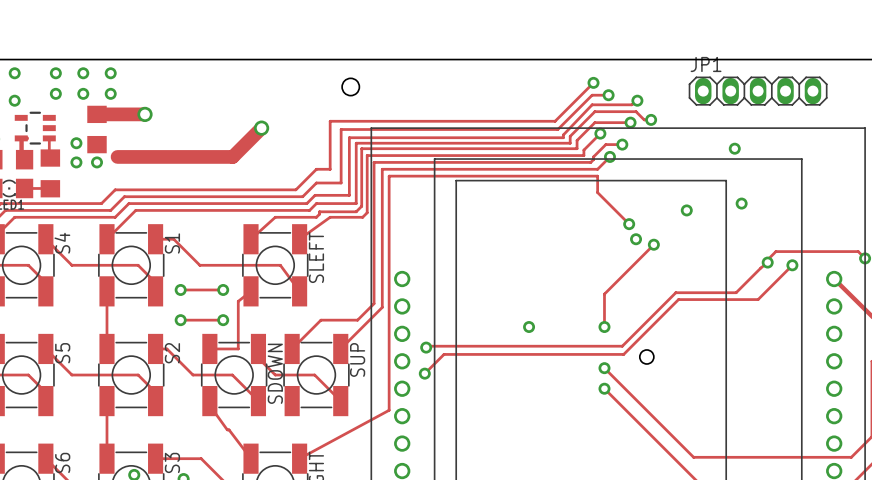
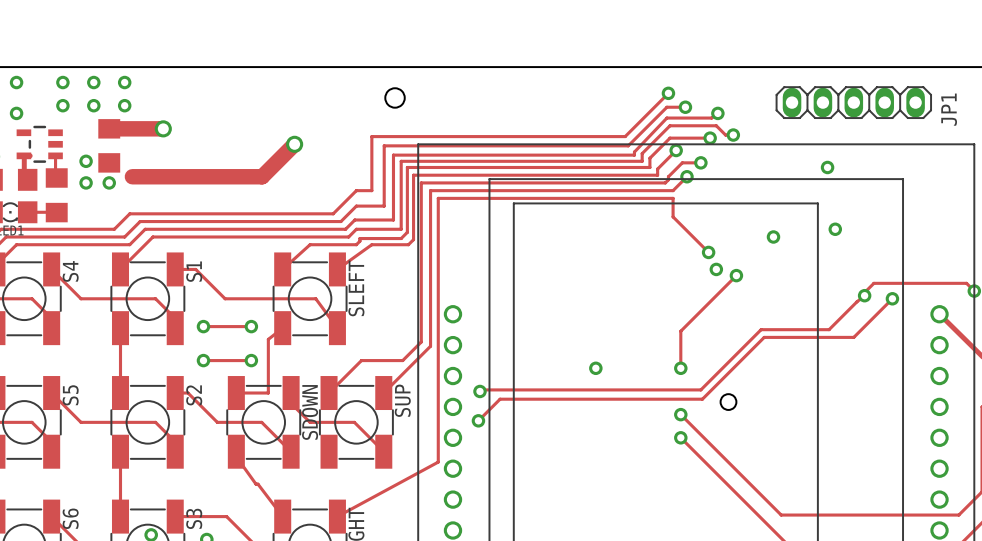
JP1 name rotation: 0° (706, 64) -> 90° counterclockwise (949, 109)
JP1 name position: JP1 (706, 64) -> JP1 (949, 109)

